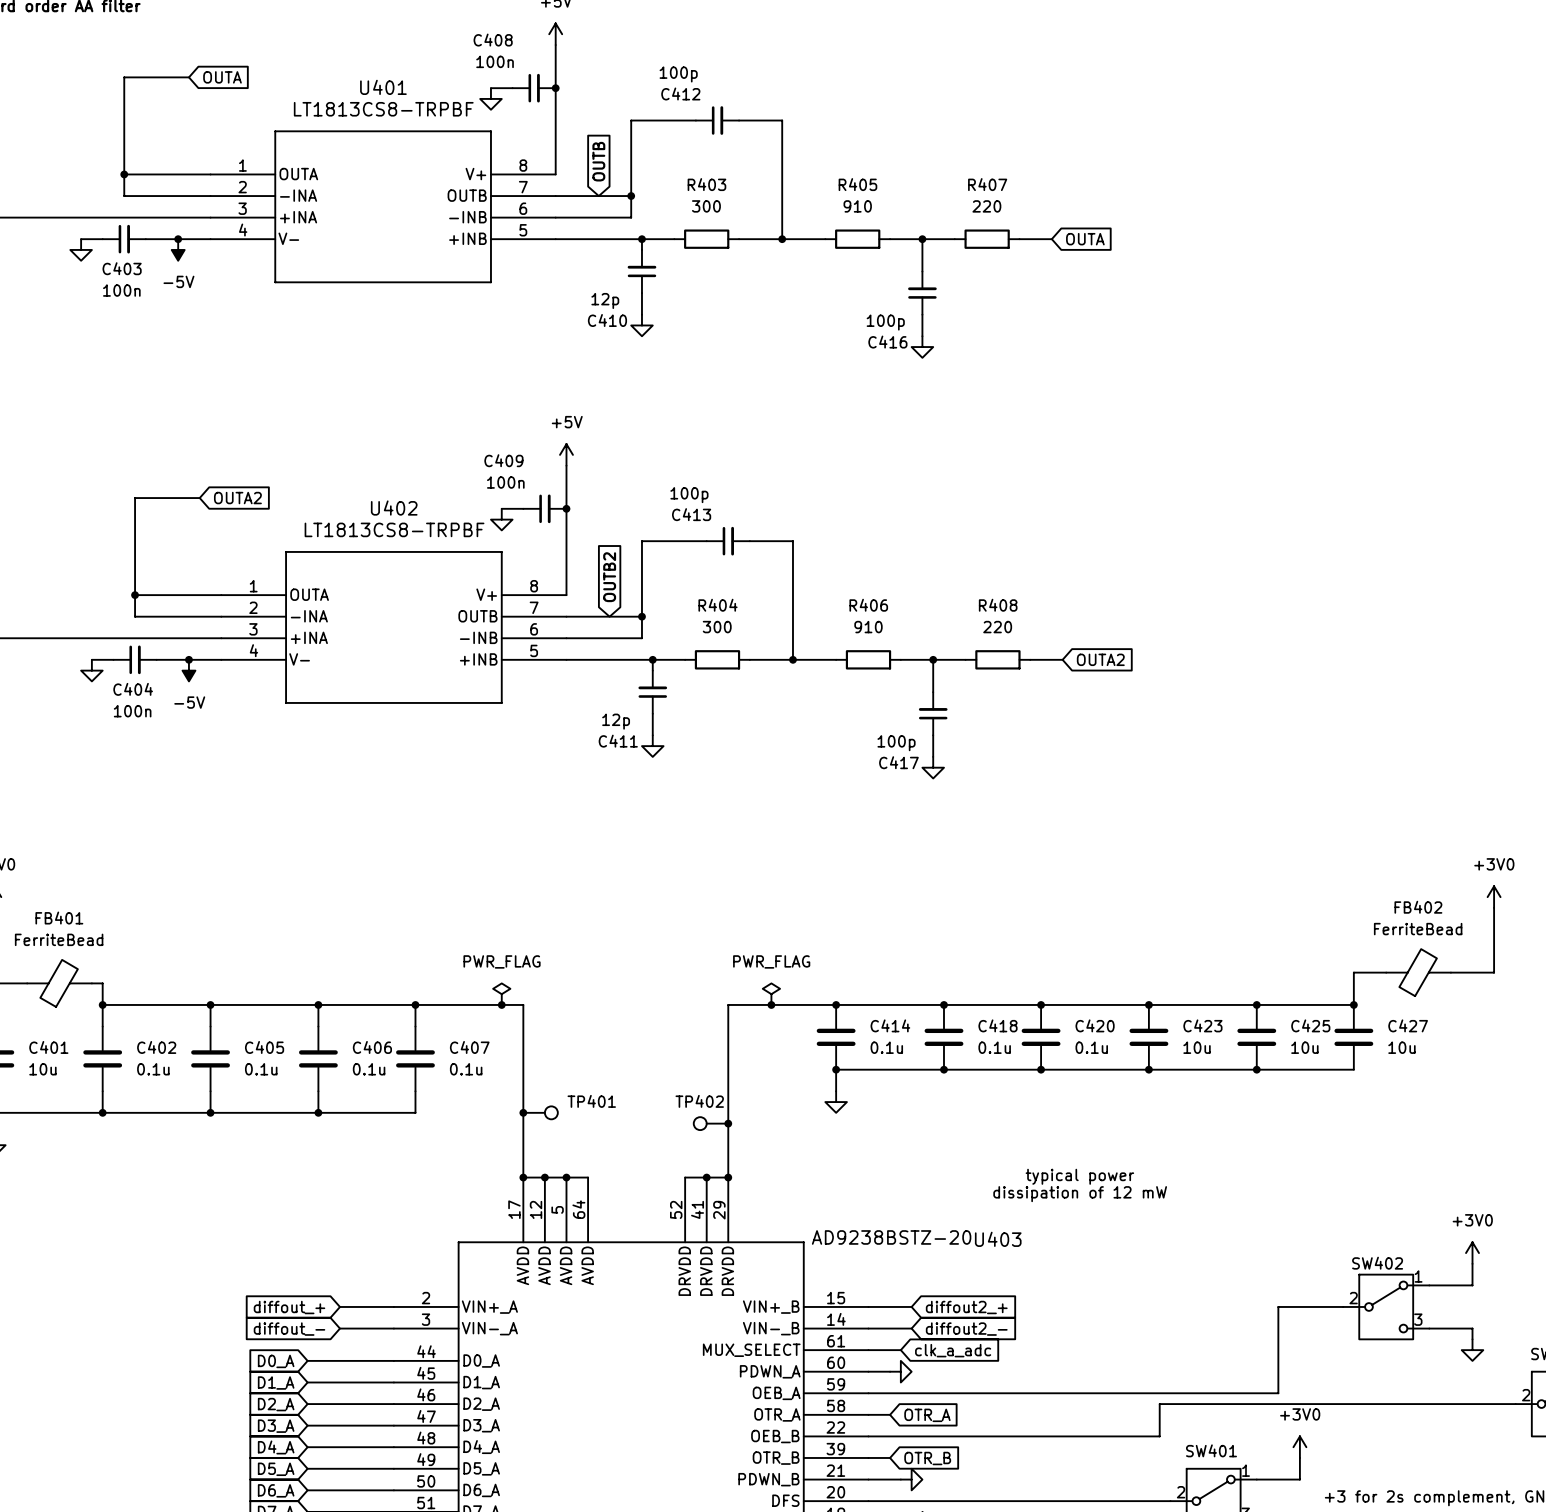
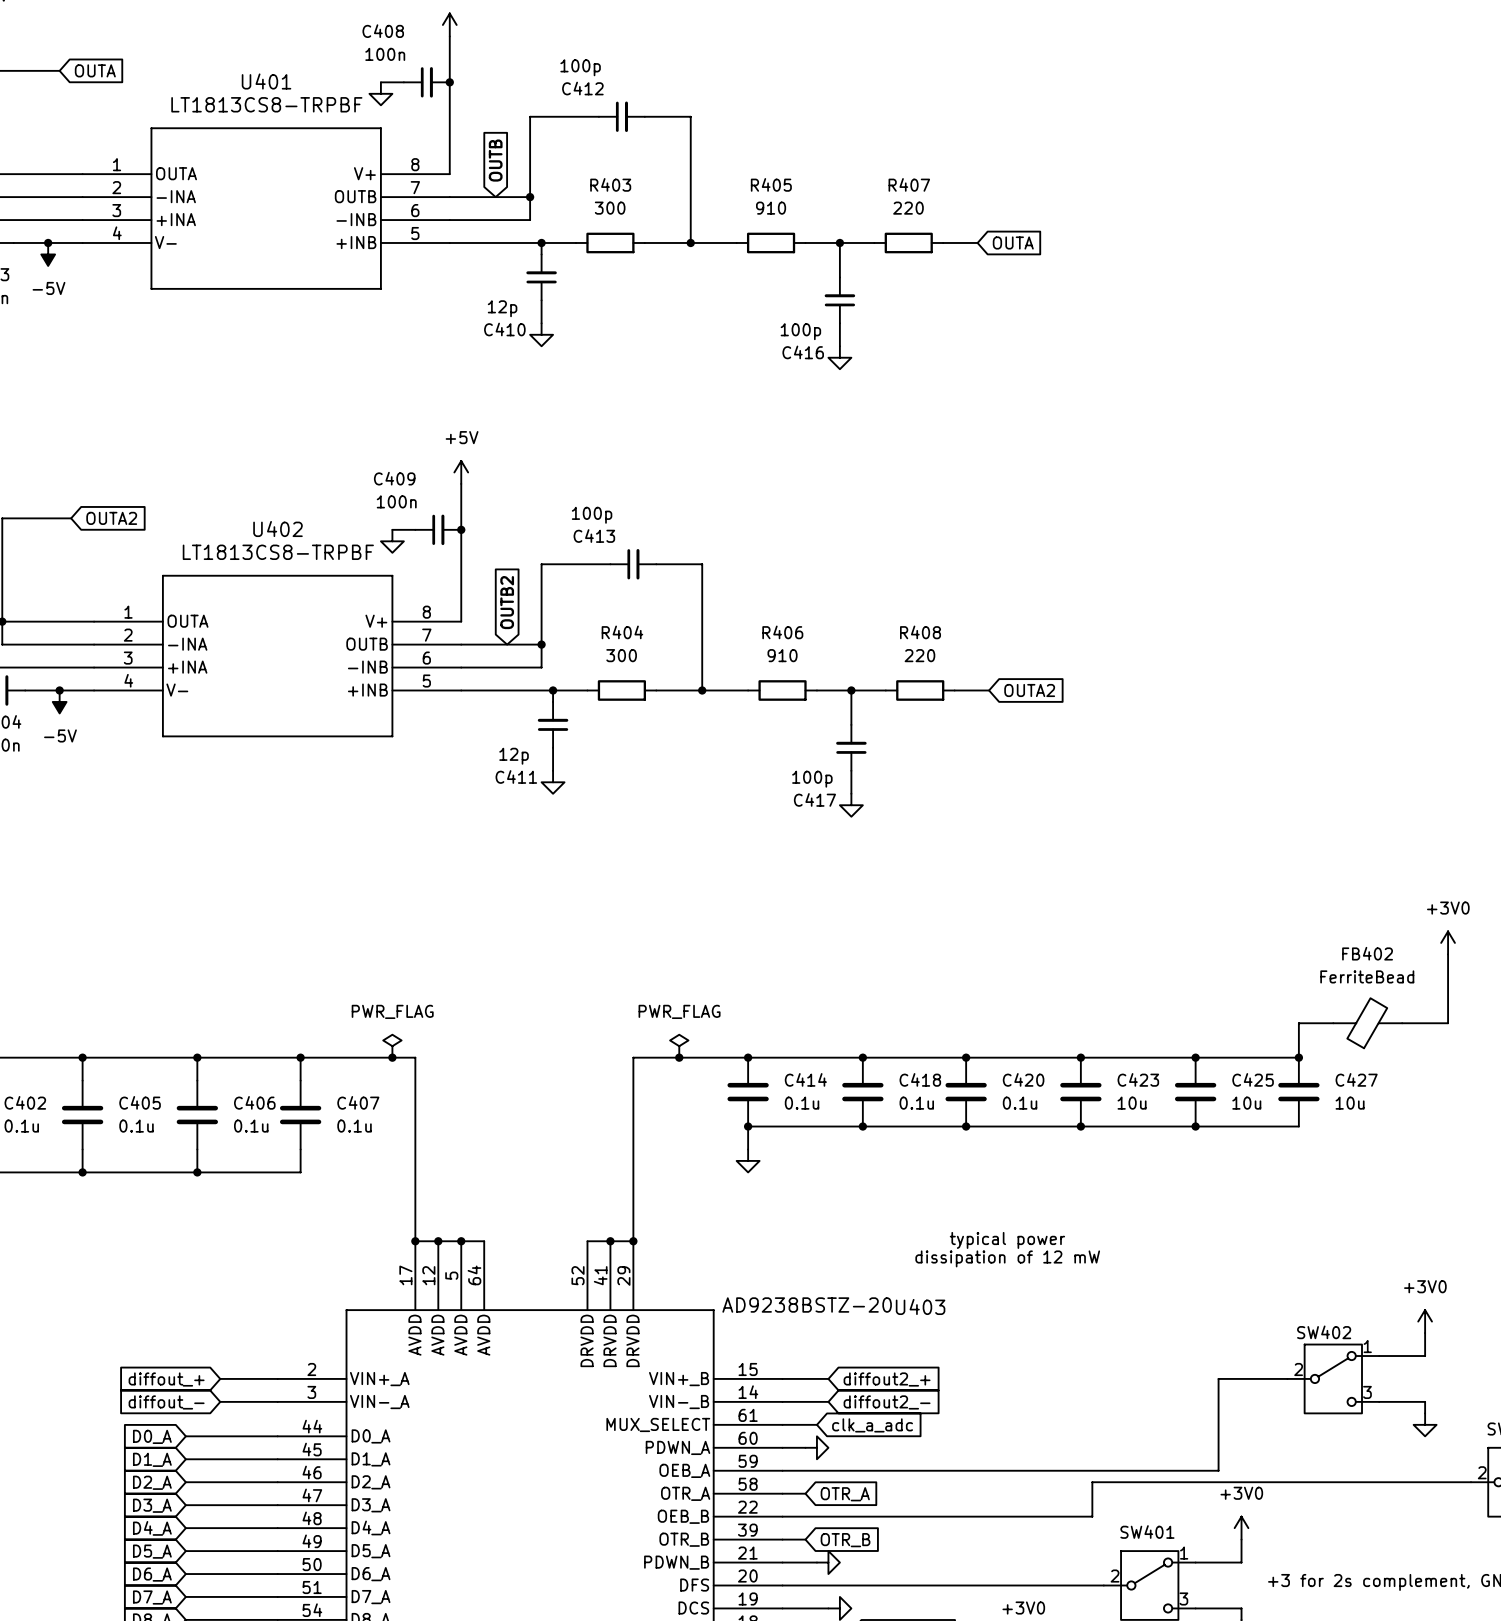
junction: (523, 1112) -> none
TP401: (540, 1112) -> none
TP402: (711, 1123) -> none
junction: (728, 1123) -> none

